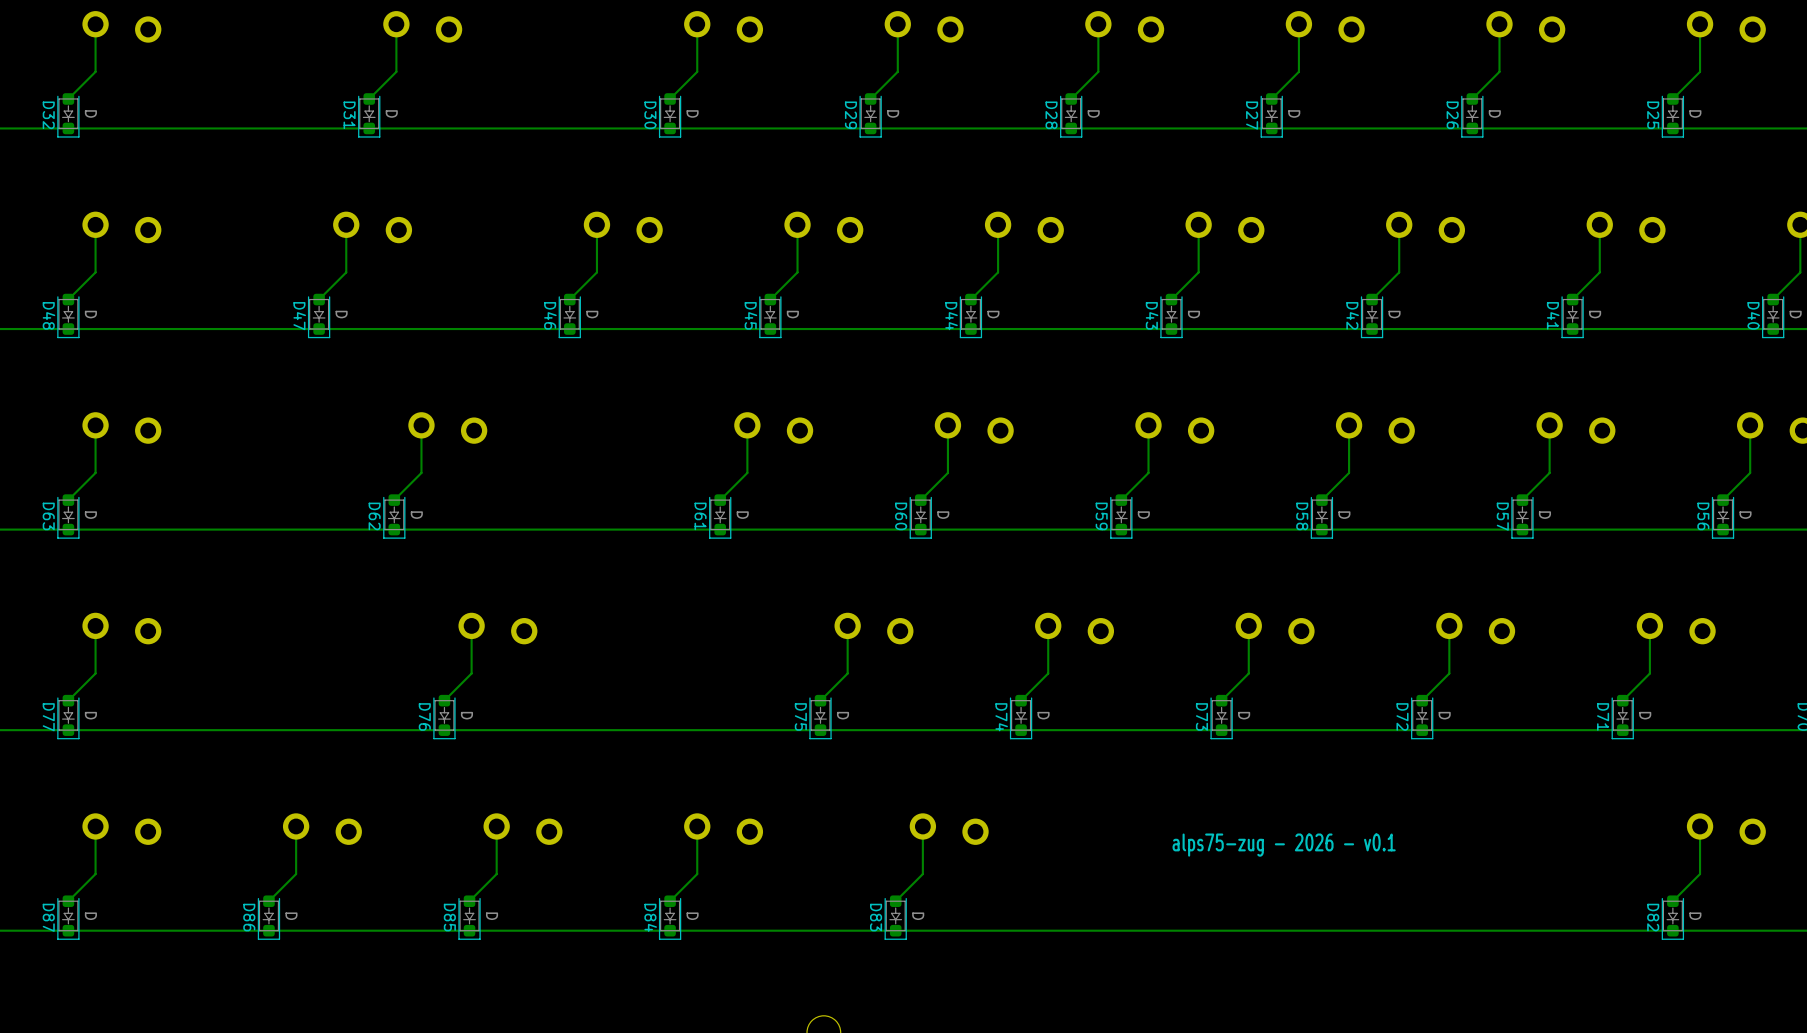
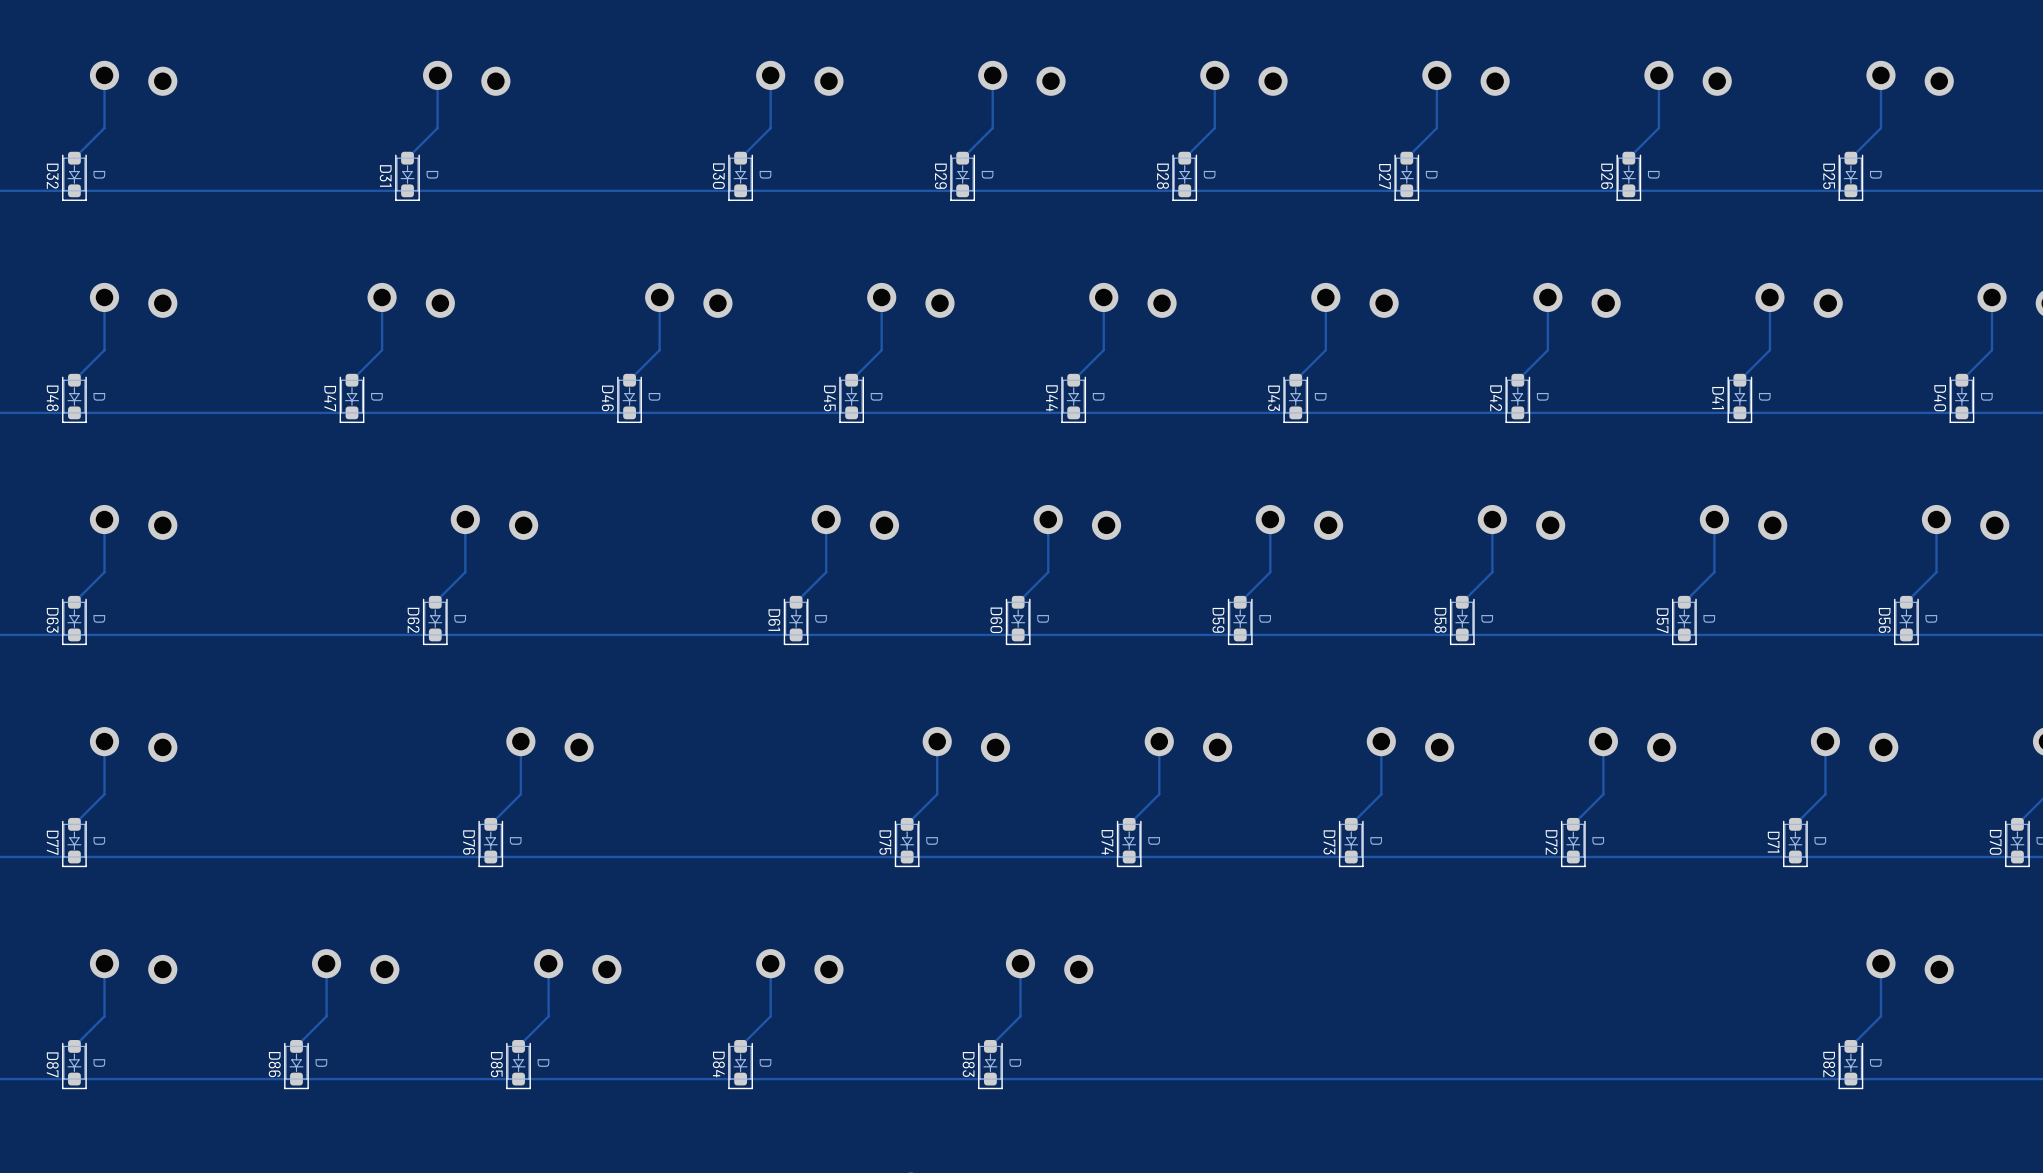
text: alps75-zug - 2026 - v0.1 (1284, 845) -> none

